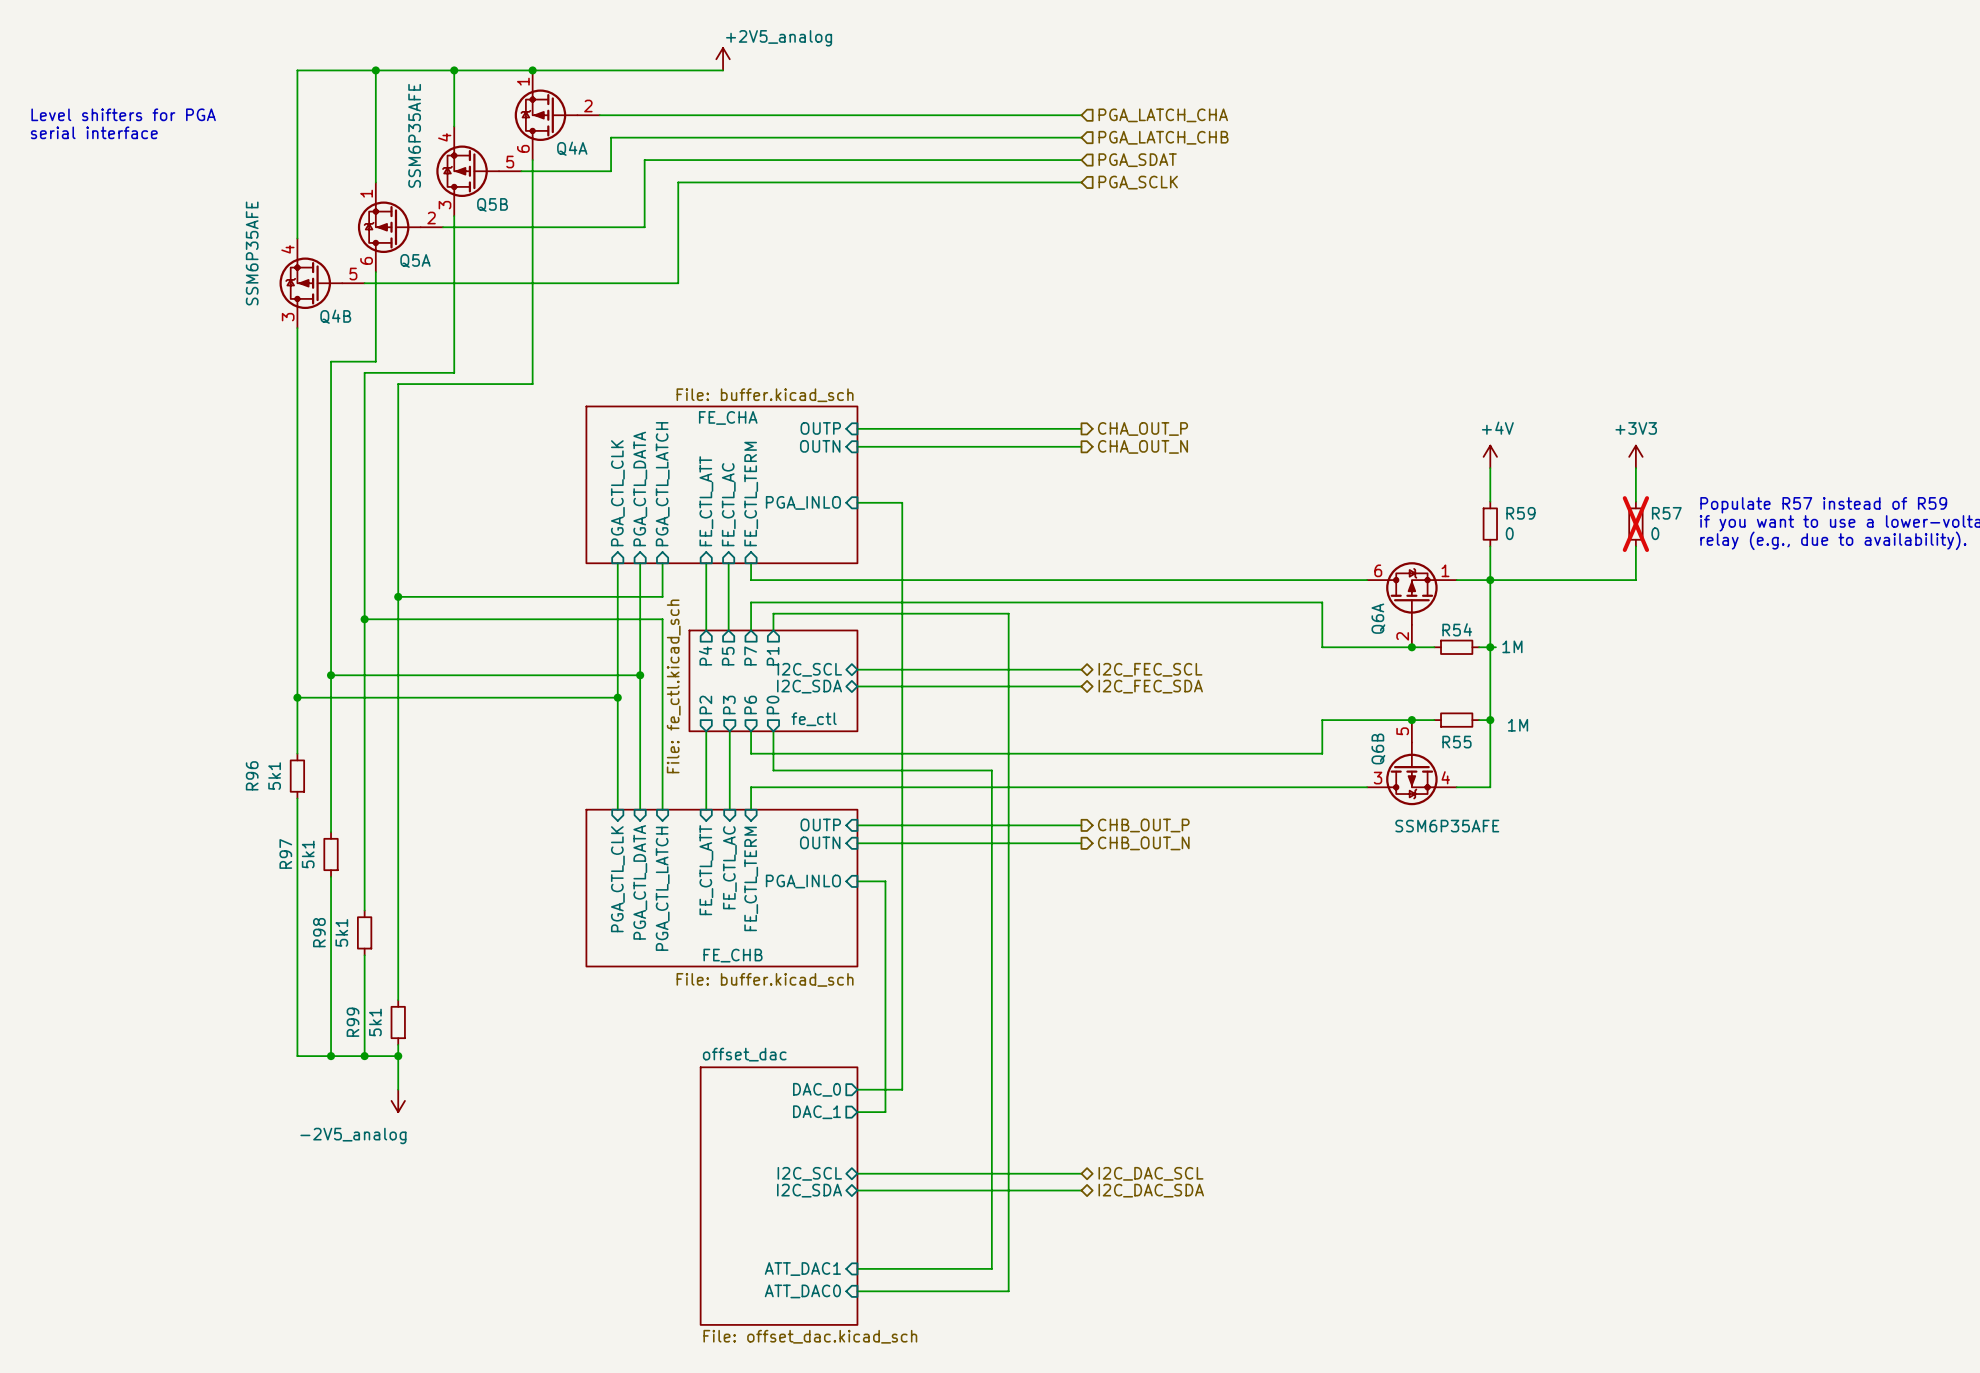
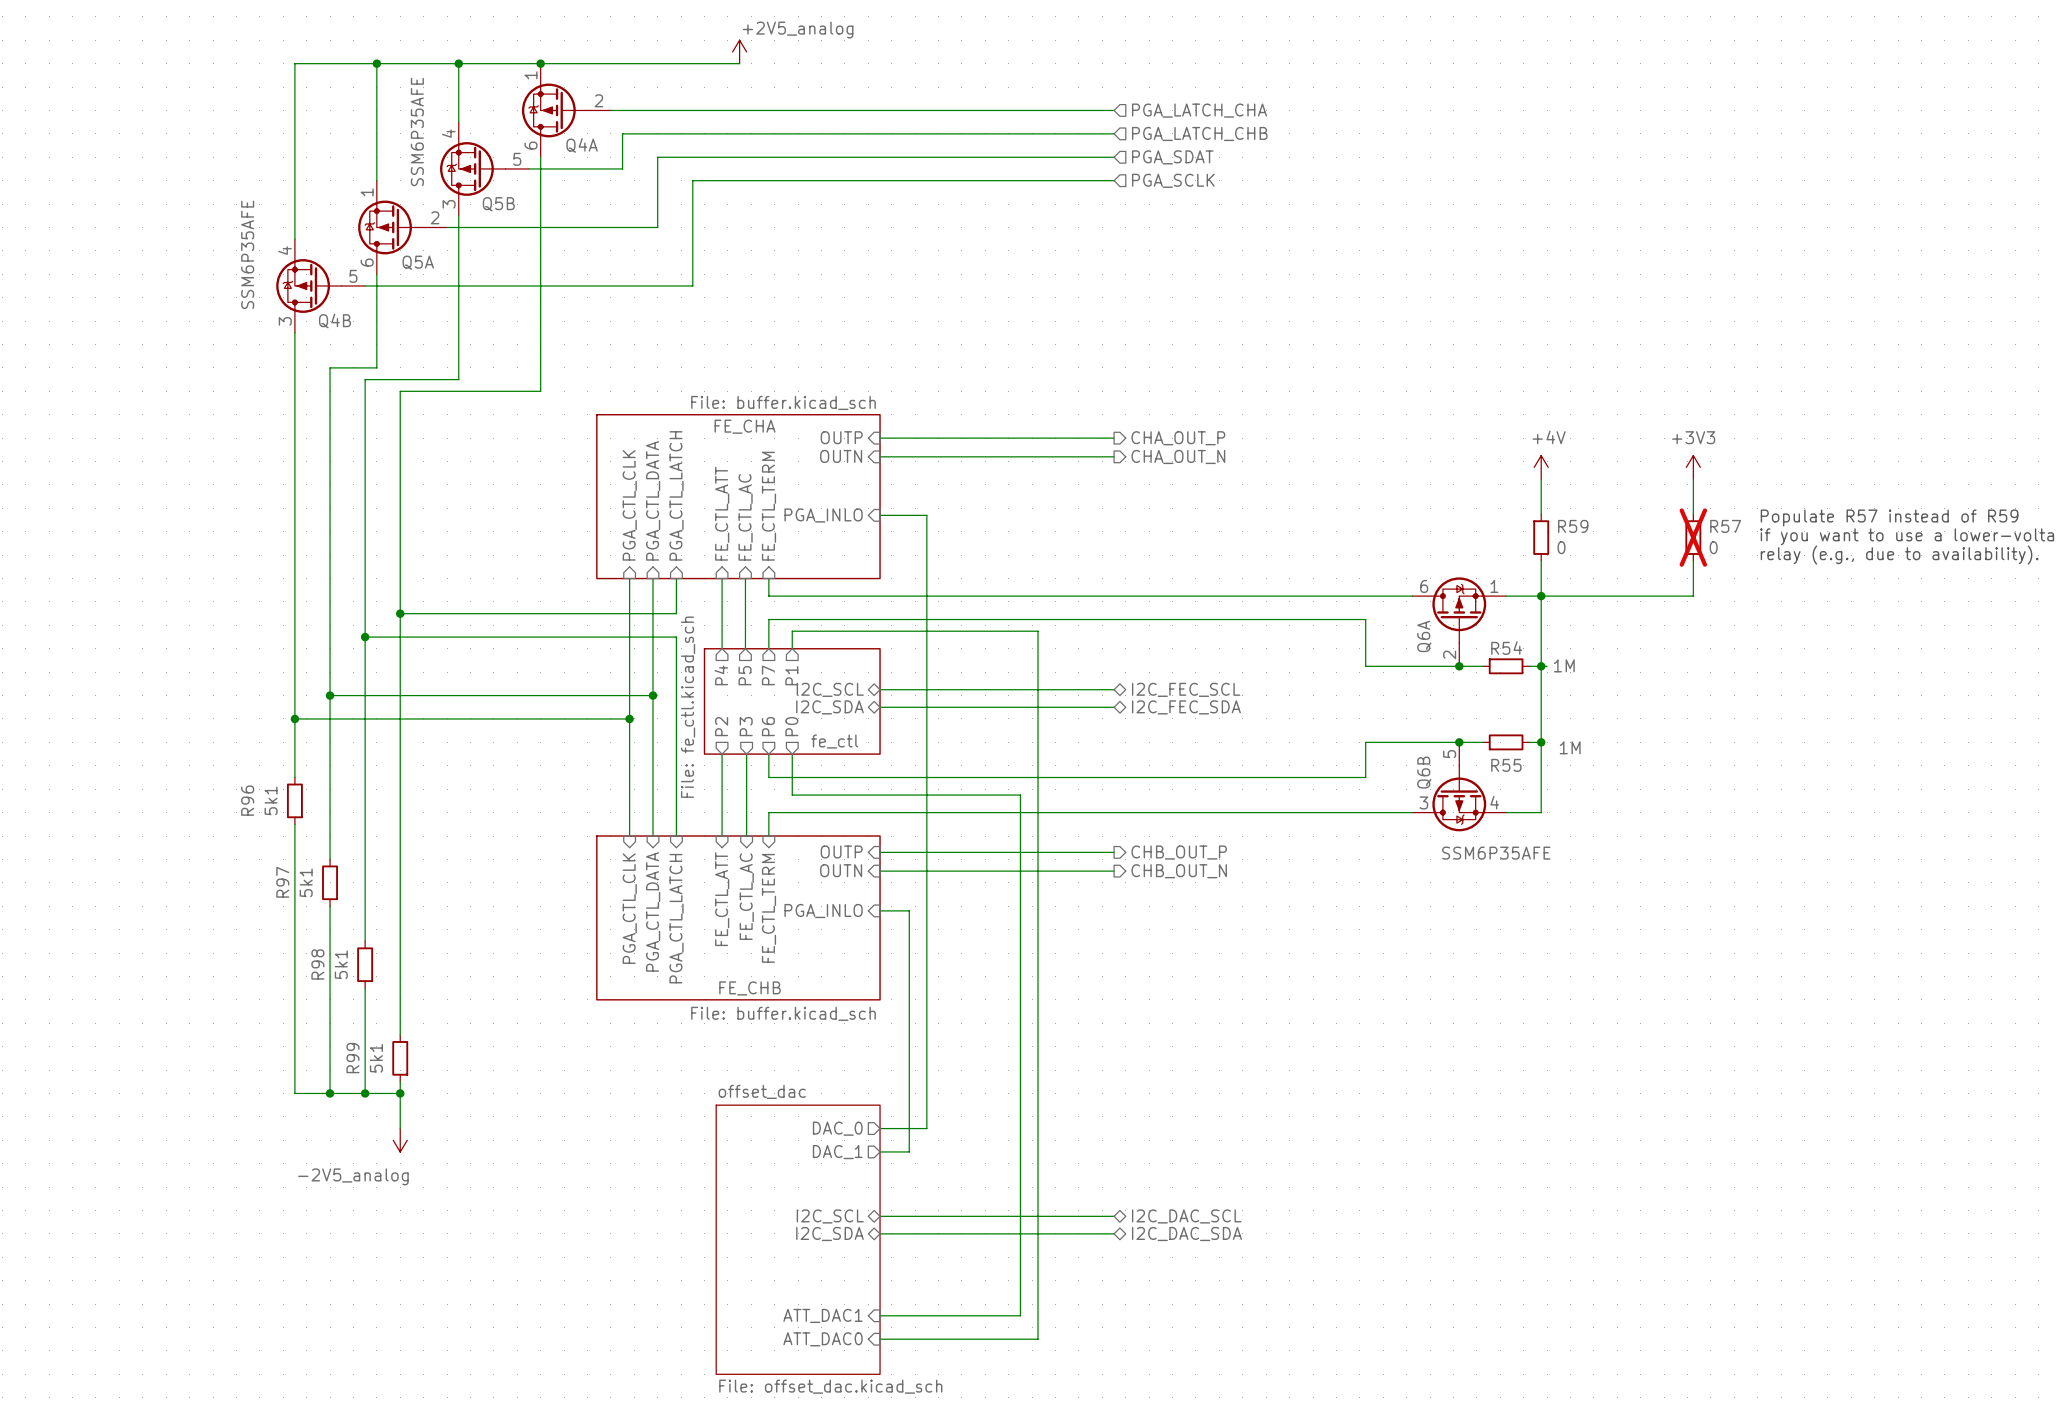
text: Level shifters for PGA (123, 114) -> none
text: serial interface (94, 132) -> none

